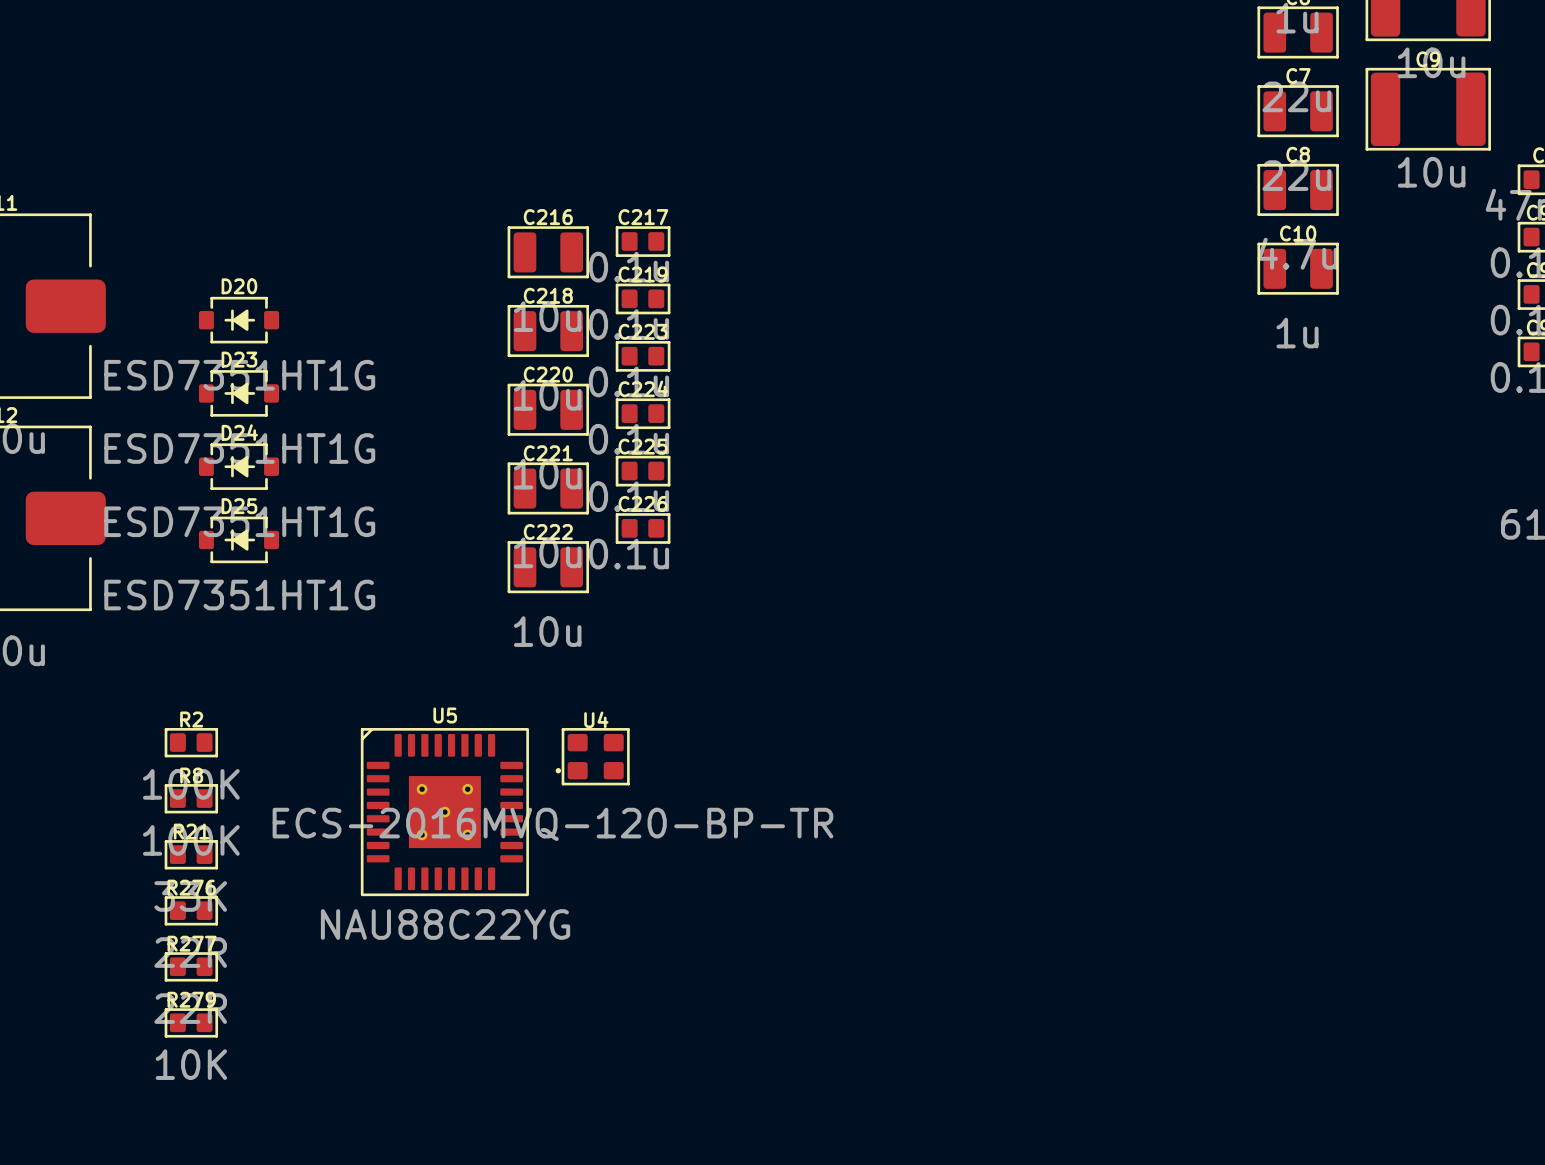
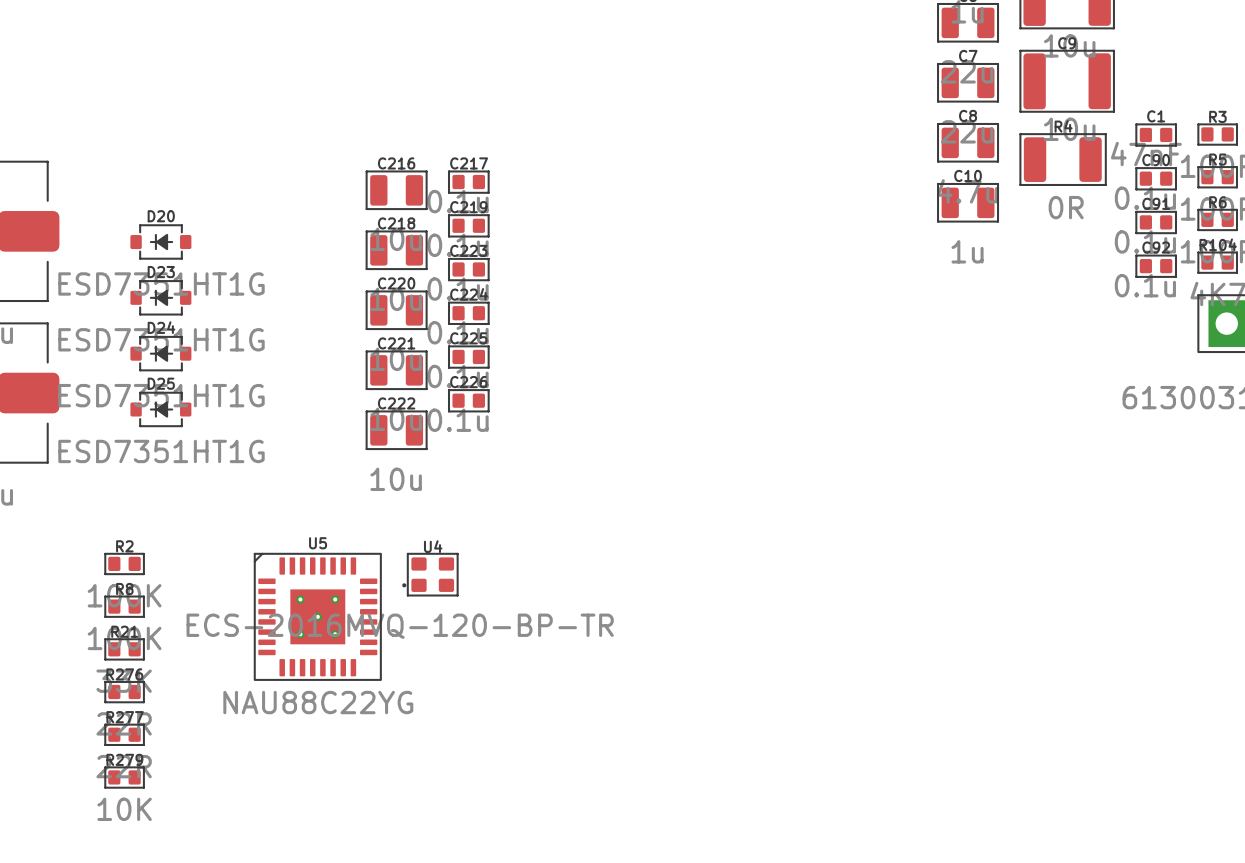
R4: none -> 0R (1063, 159)

